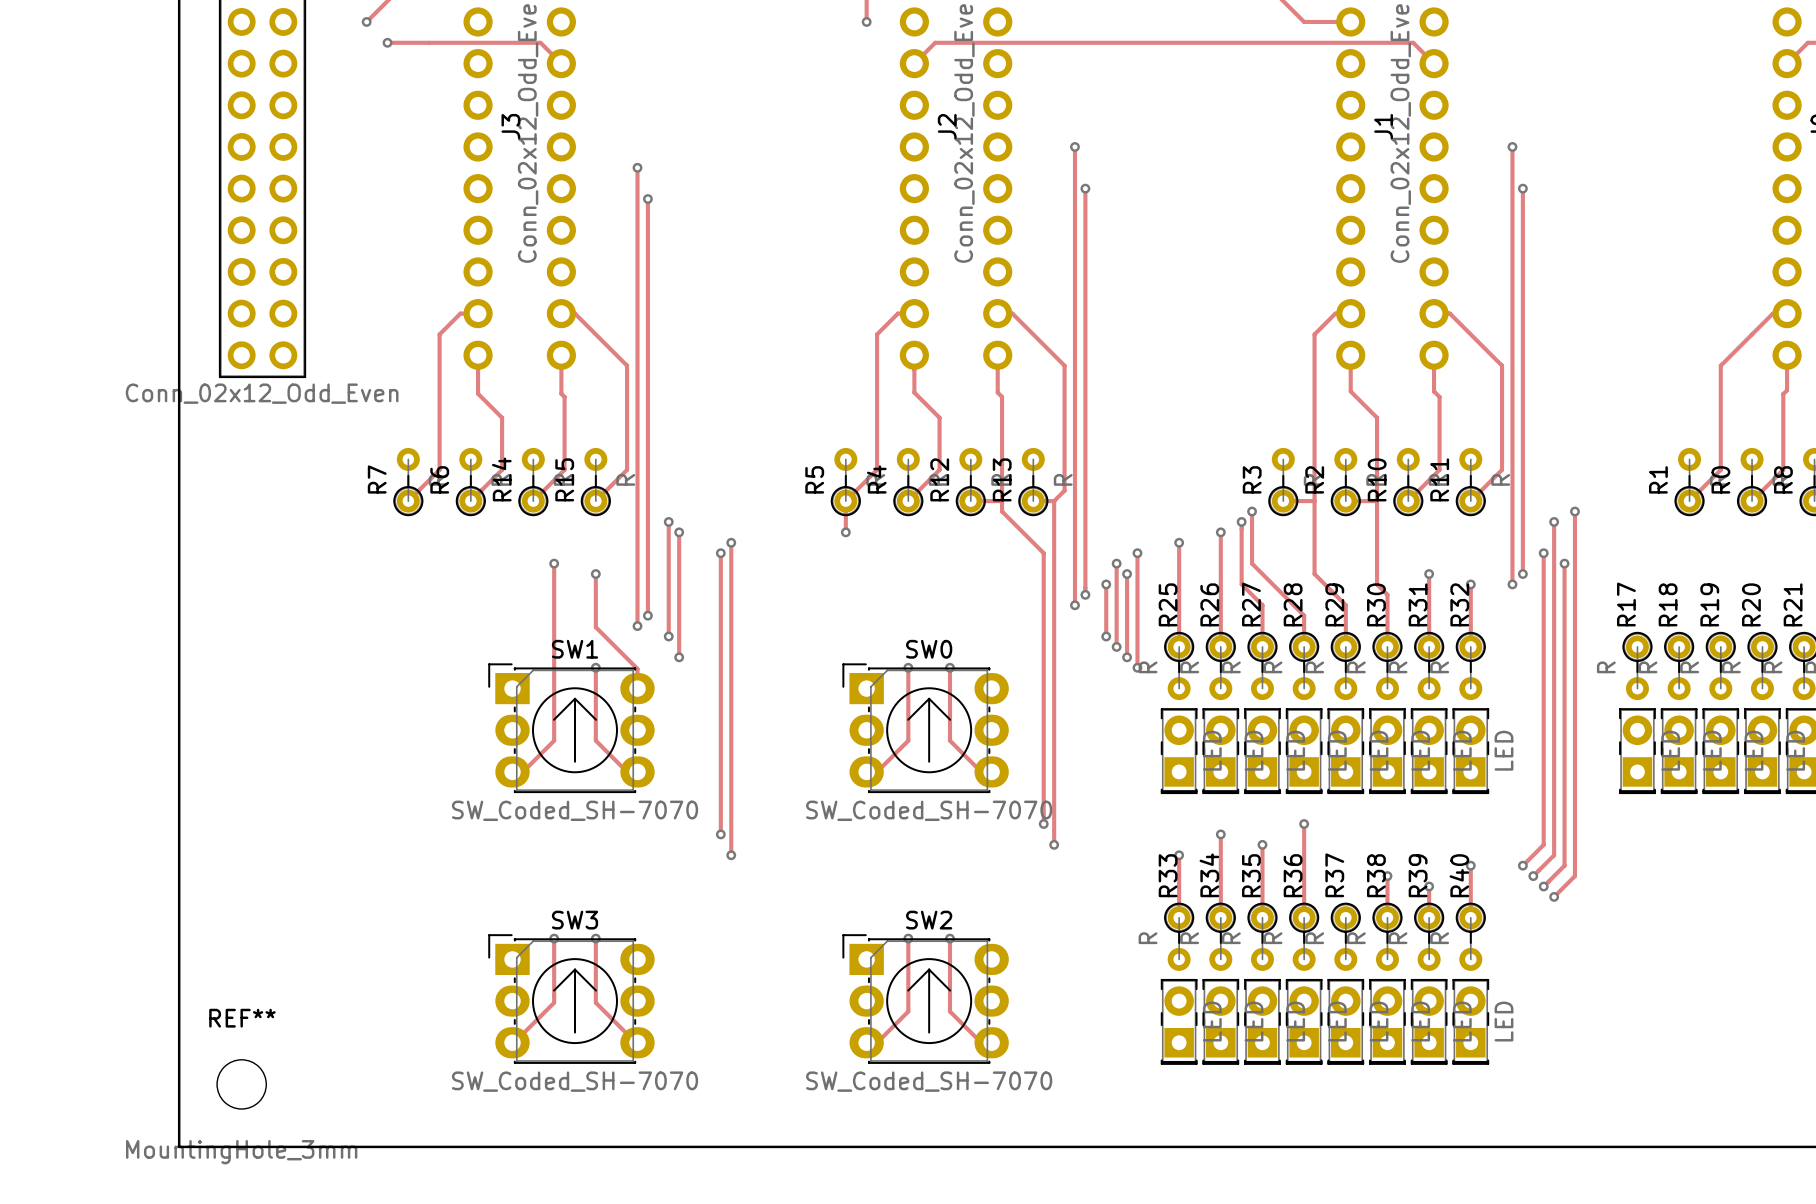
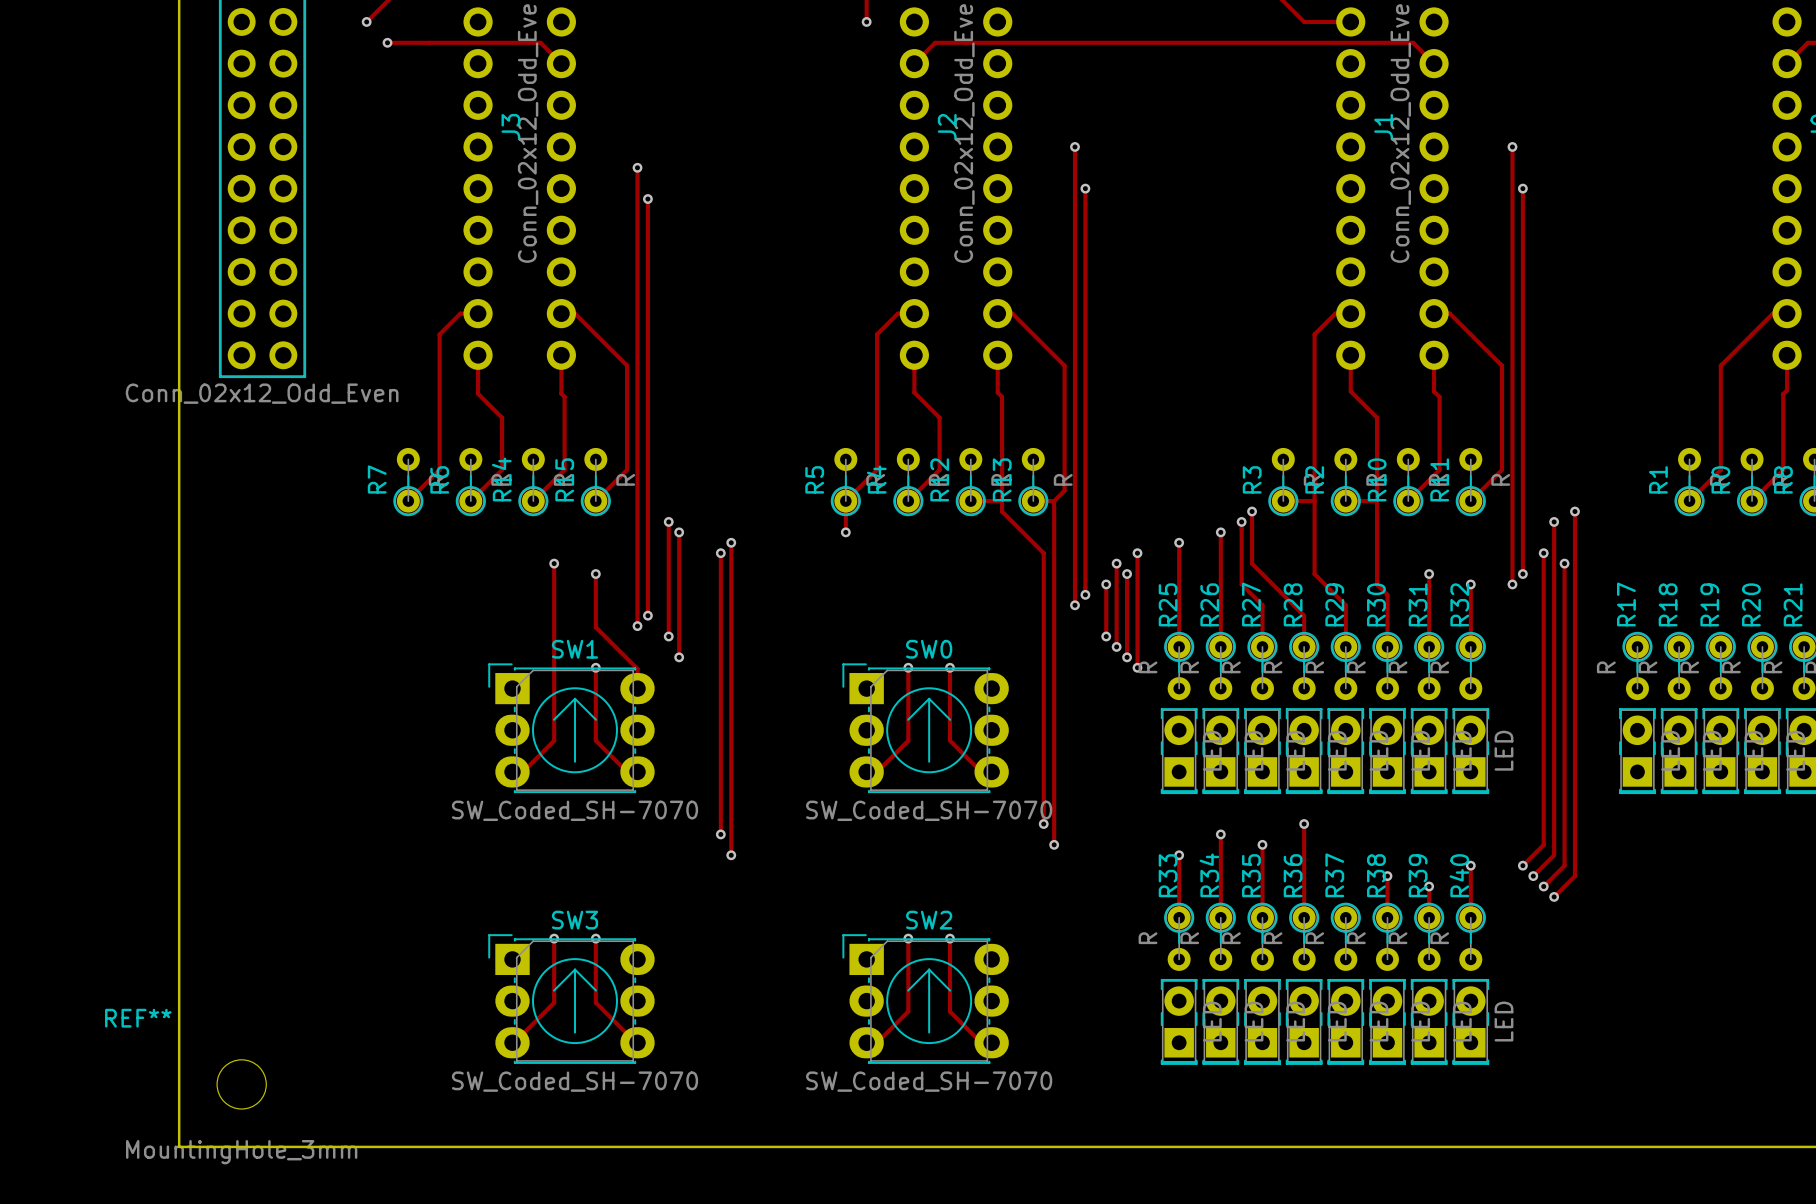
REF** name position: REF** (242, 1018) -> REF** (138, 1018)

